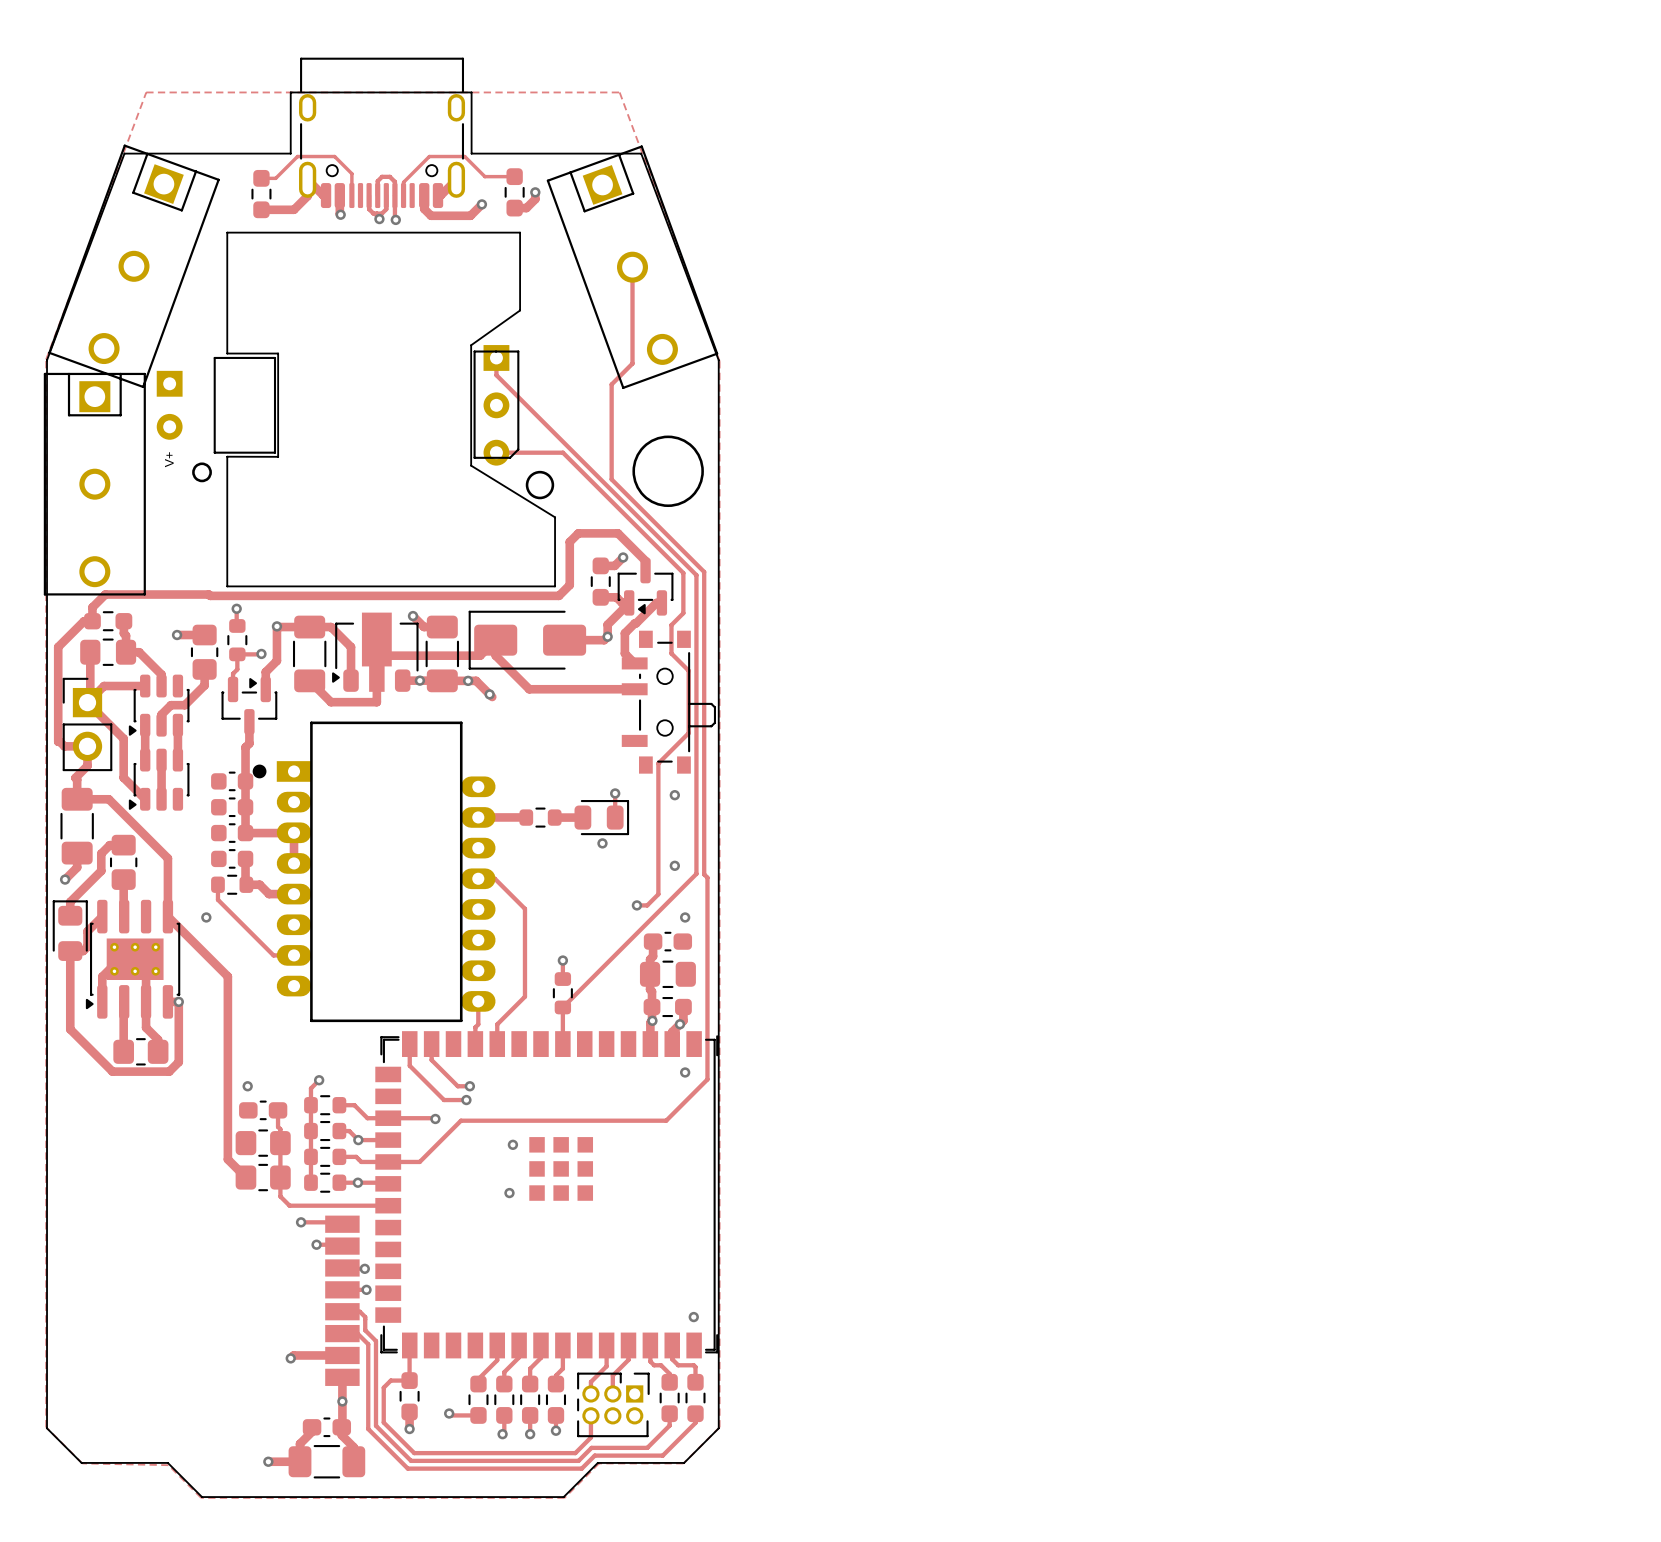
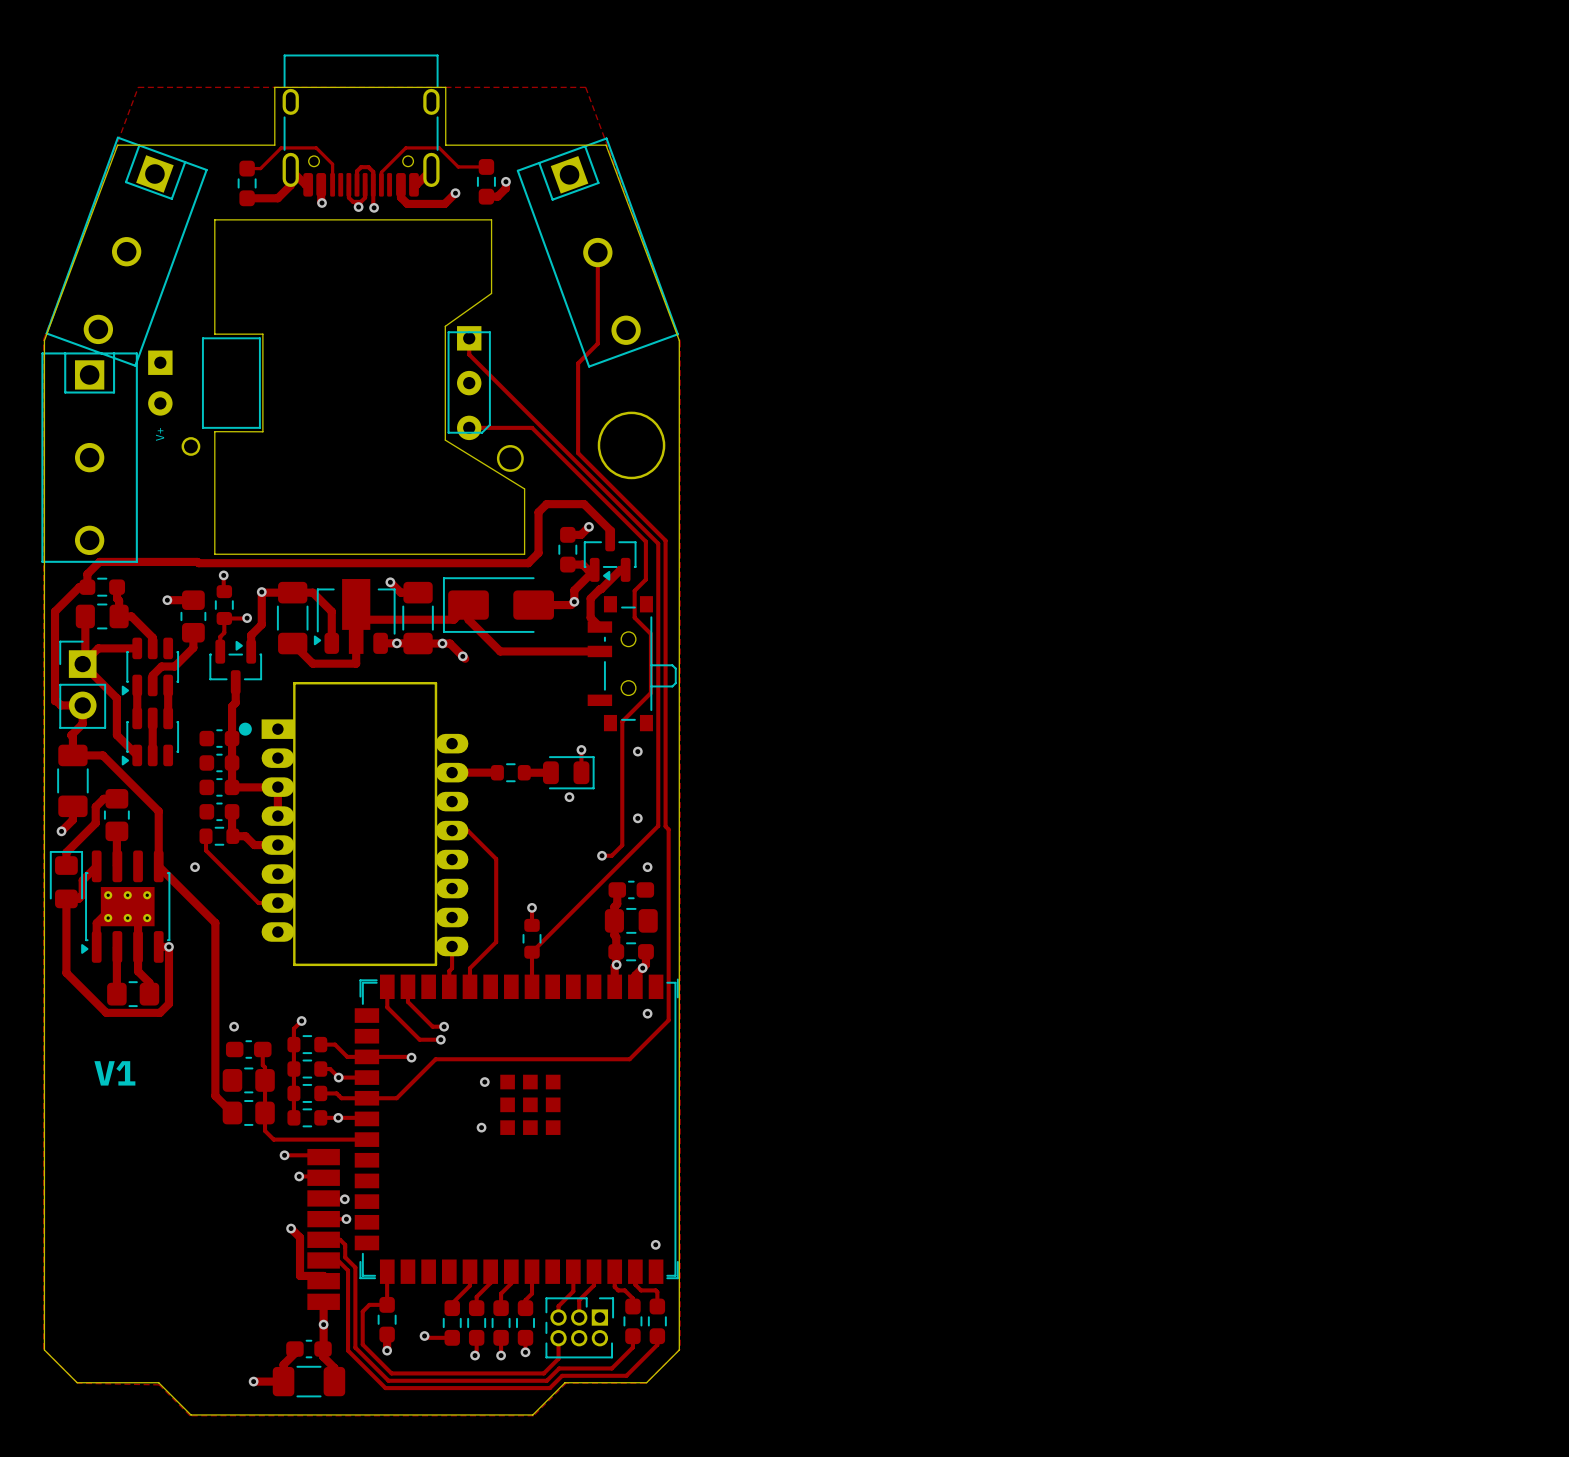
text: none -> V1 (114, 1073)
track: (342, 1355) (293, 1355) (290, 1358) -> (323, 1281) (323, 1275) (300, 1275) (300, 1237) (291, 1228)
via position: (290, 1358) -> (291, 1228)

